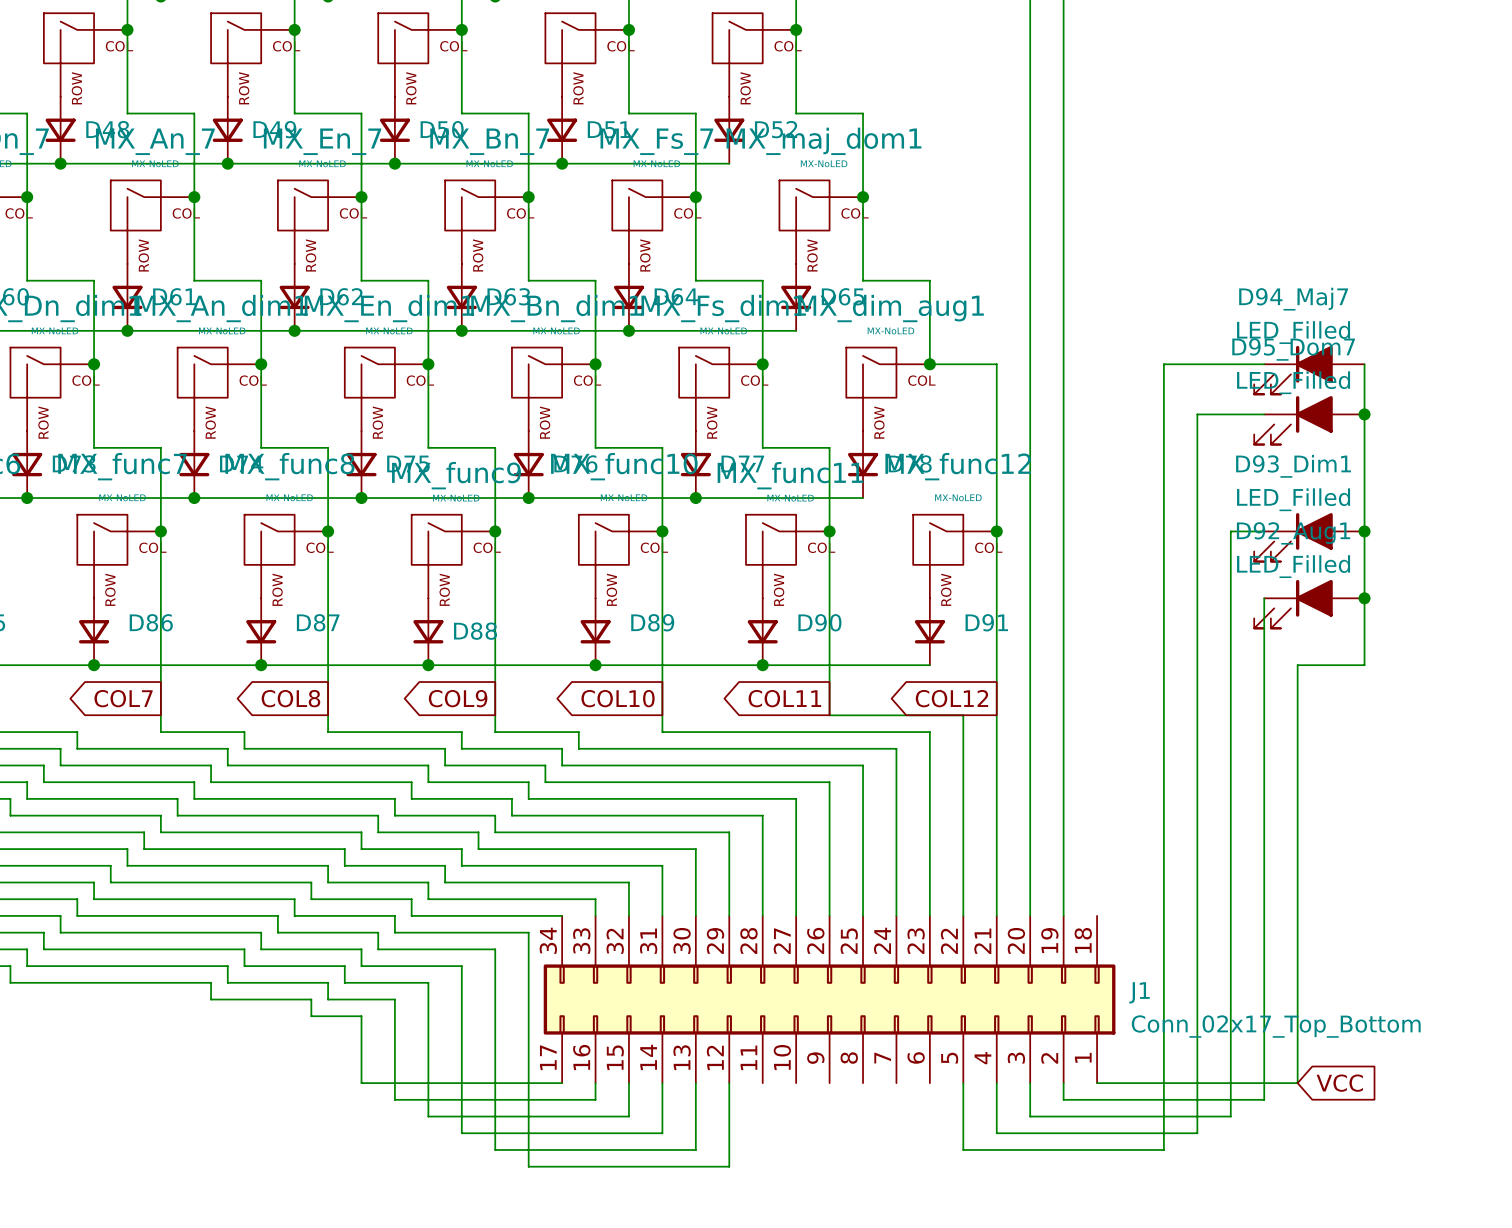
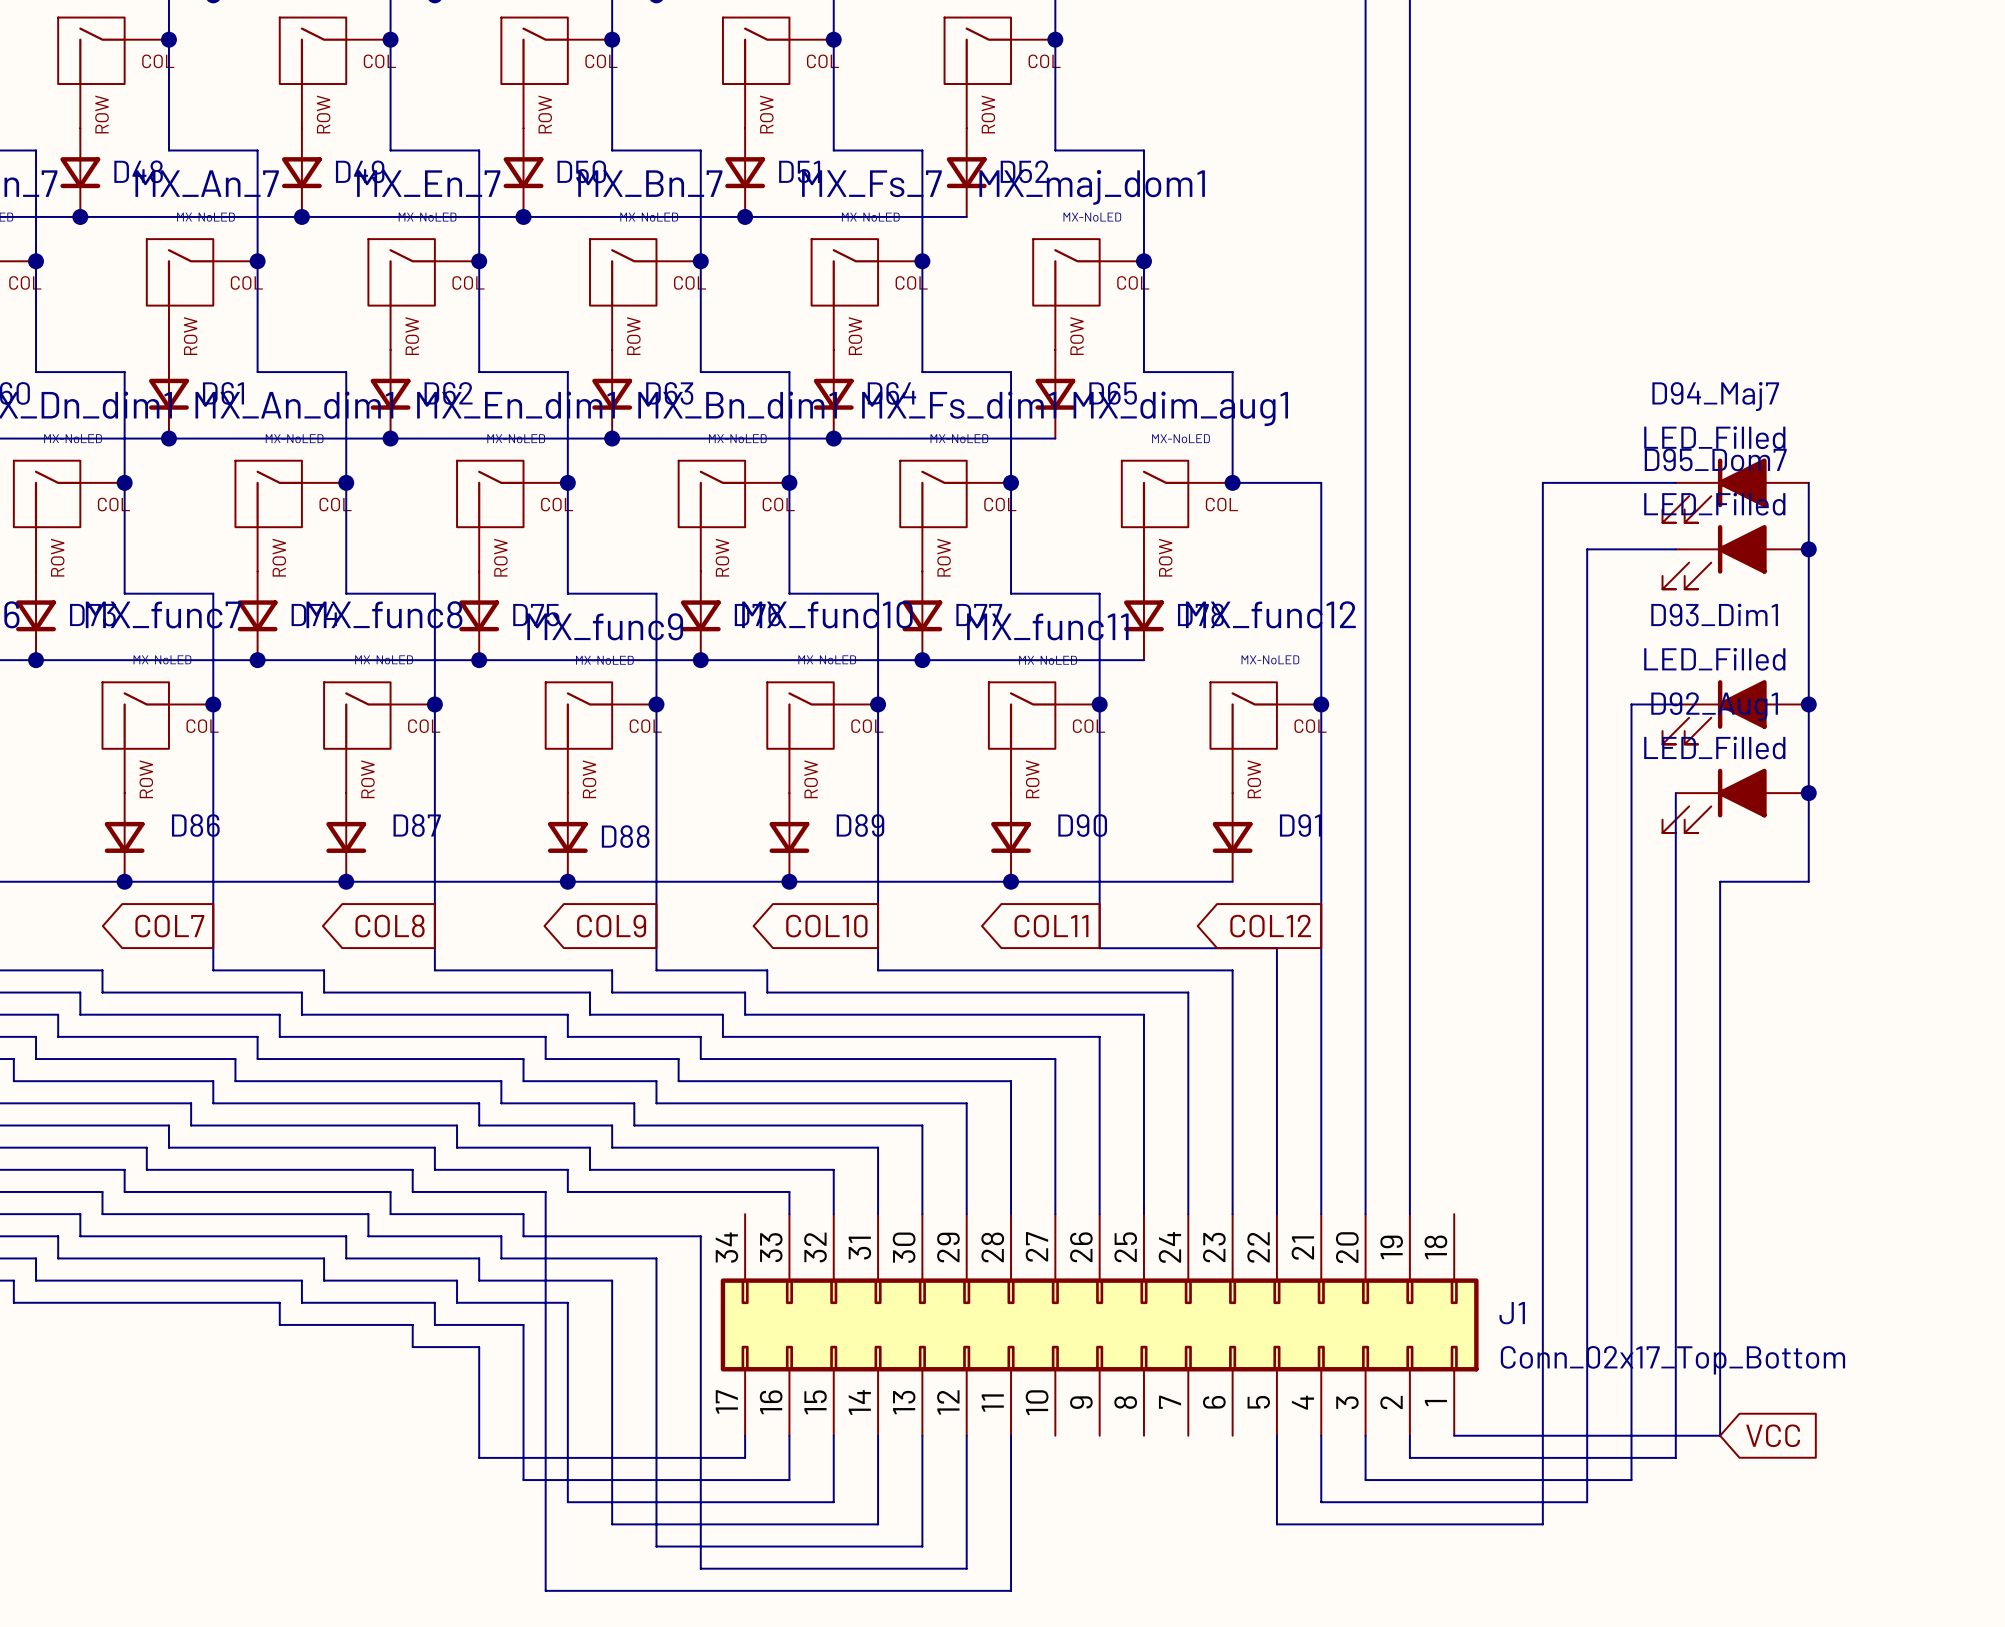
wire: (411, 915) (562, 915) -> (545, 1214) (545, 1590) (1011, 1590) (1011, 1435)
wire: (361, 1083) (562, 1083) -> (479, 1435) (479, 1457) (523, 1457) (523, 1480) (567, 1480) (567, 1502) (612, 1502) (612, 1524) (656, 1524) (656, 1546) (700, 1546) (700, 1568) (966, 1568) (966, 1546)
wire: (562, 1099) (595, 1099) -> (745, 1457) (745, 1435)
wire: (595, 1116) (628, 1116) -> (789, 1480) (789, 1457)
wire: none -> (833, 1480) (833, 1502)
wire: (628, 1133) (662, 1133) -> (878, 1524) (878, 1502)
wire: (662, 1149) (695, 1149) -> none
wire: (695, 1166) (729, 1166) -> (922, 1546) (922, 1524)

